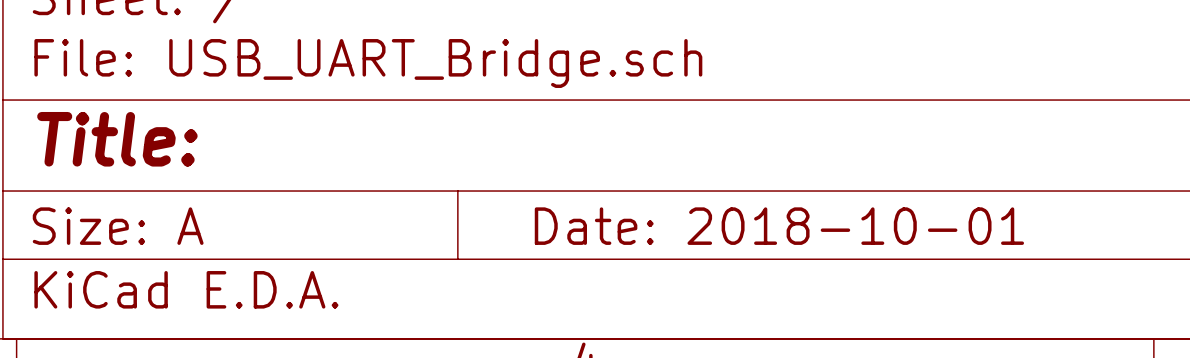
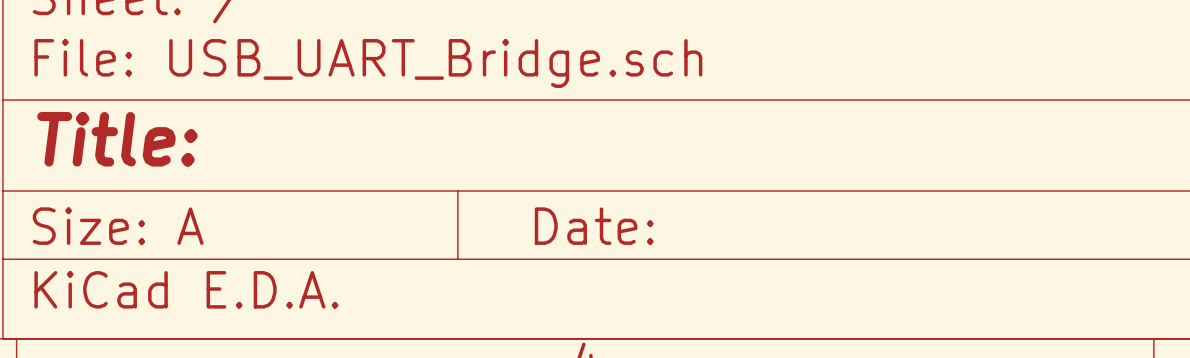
title block: Date: 2018-10-01 (779, 226) -> Date: (594, 226)

